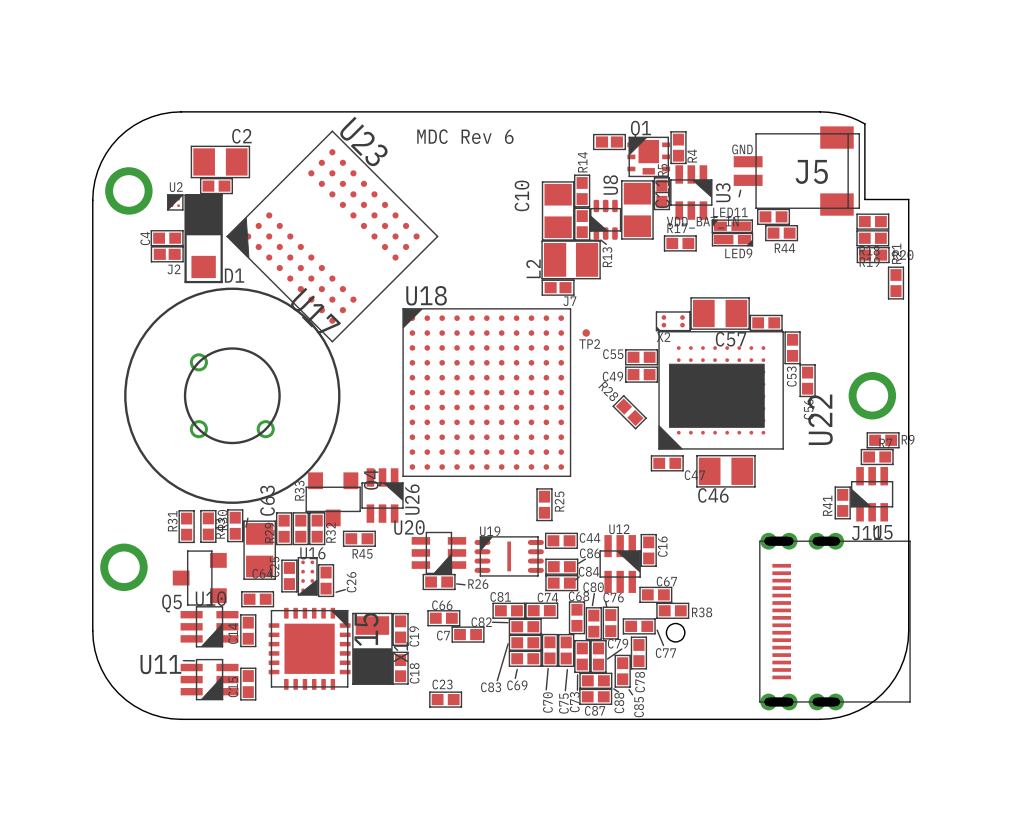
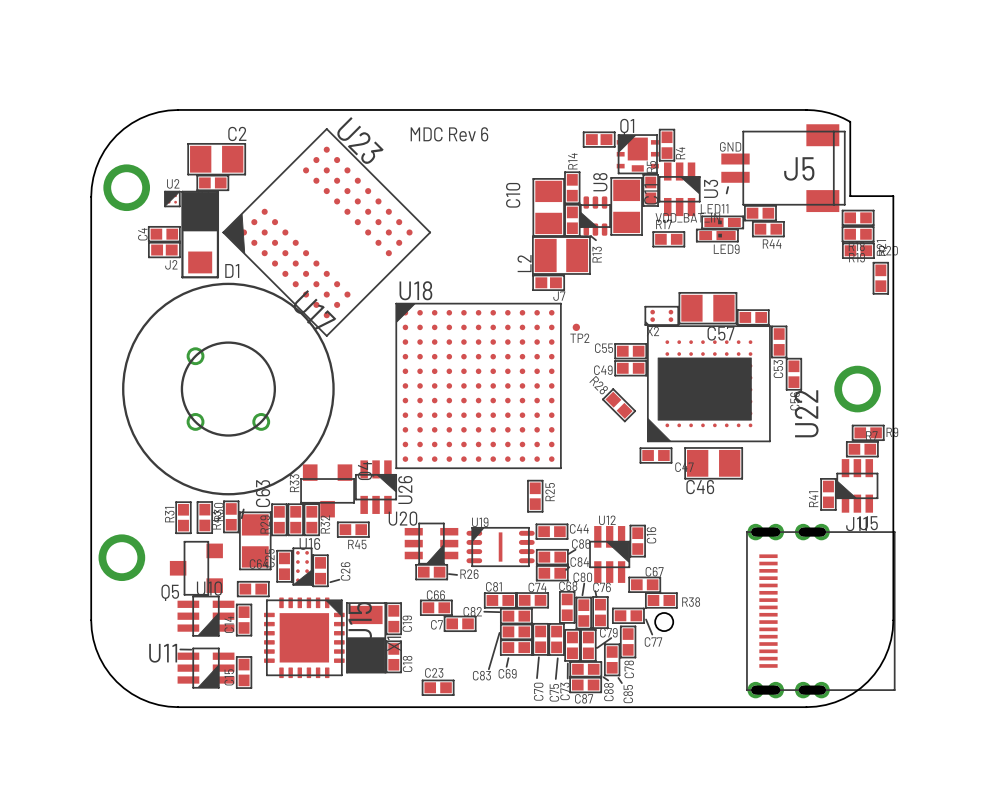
LED11 footprint: [711, 219, 753, 233] -> [701, 215, 744, 229]
LED9 footprint: [712, 233, 753, 247] -> [696, 229, 739, 243]

